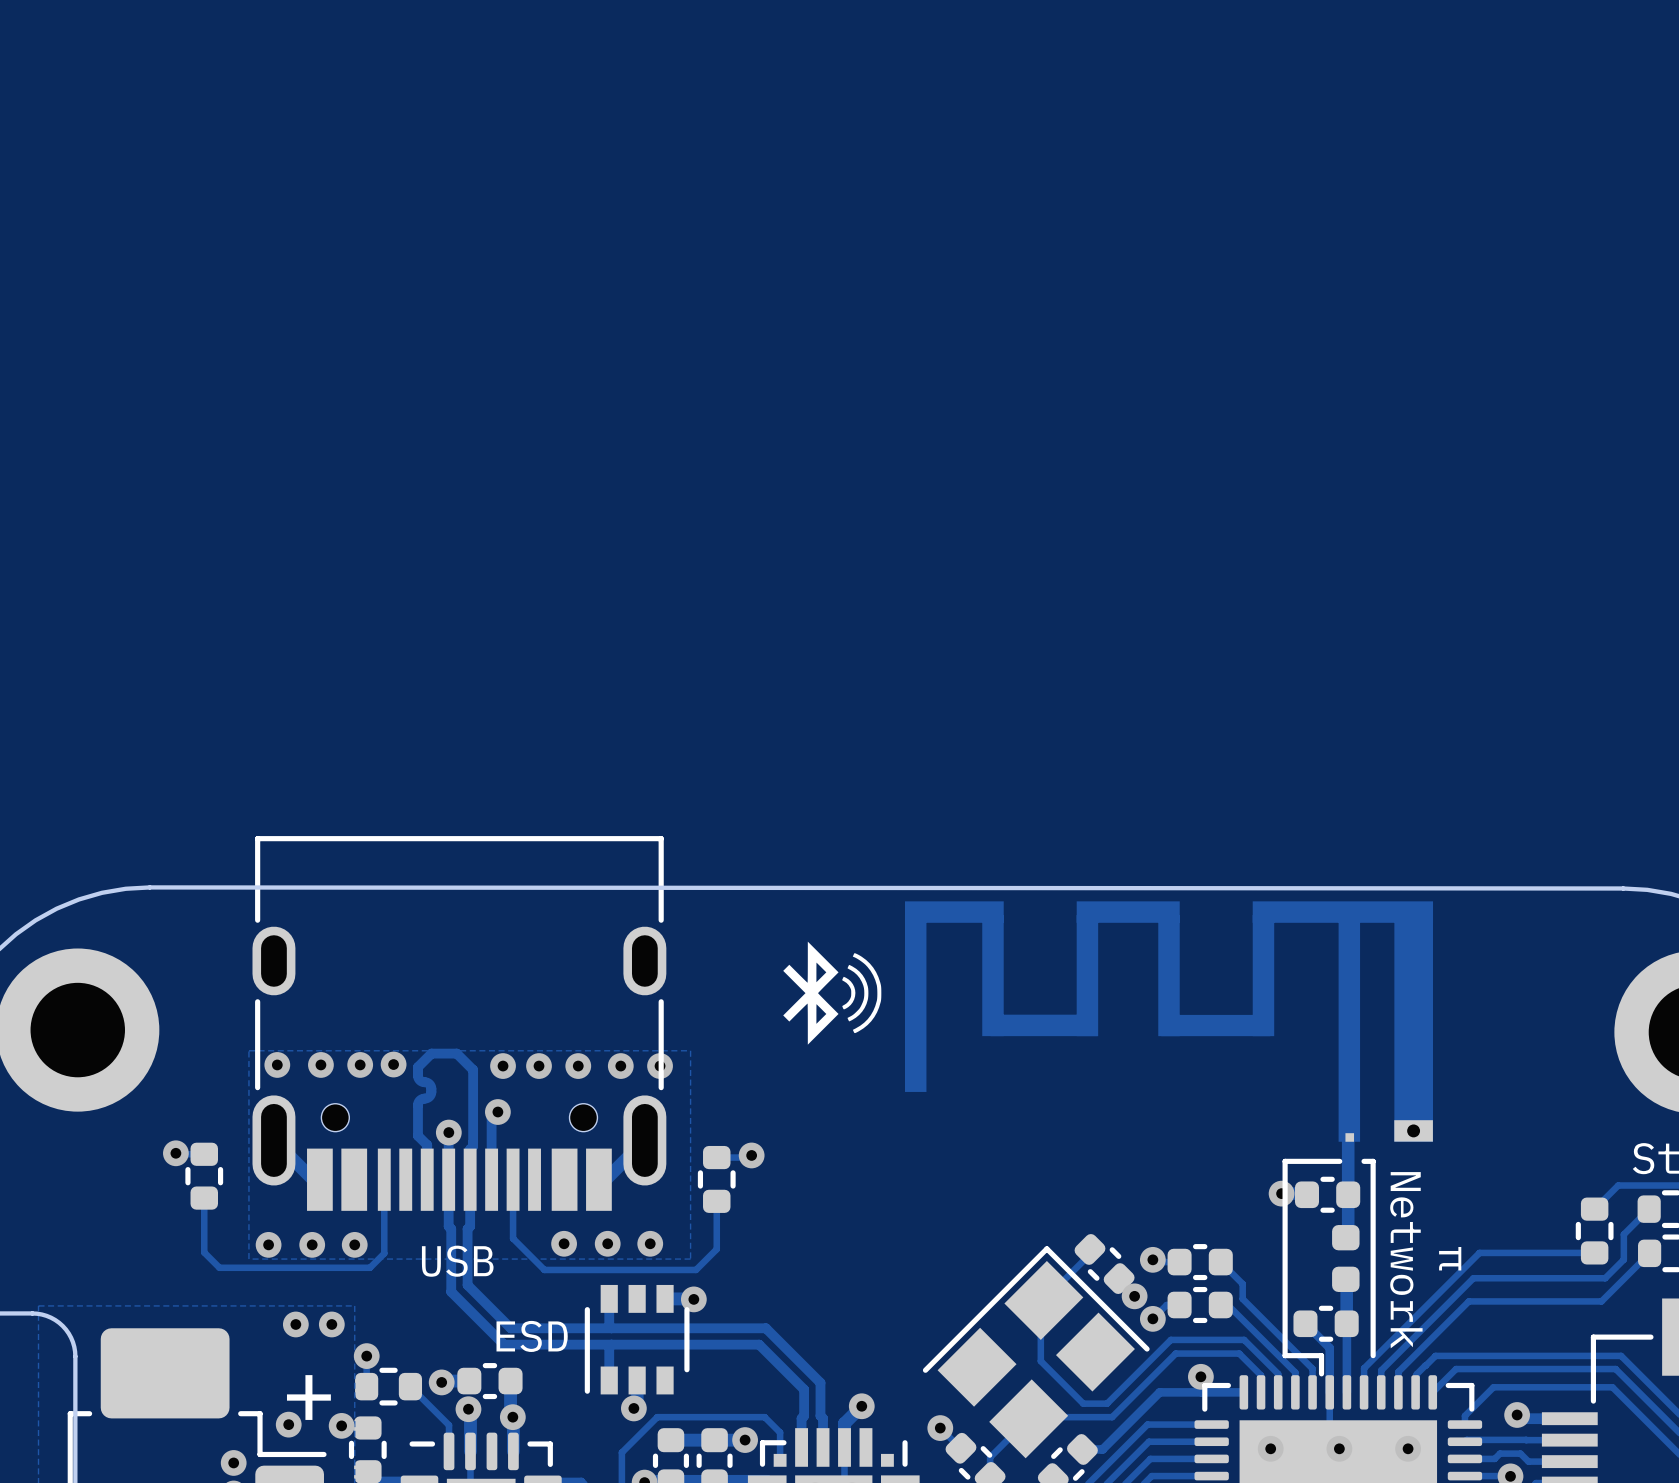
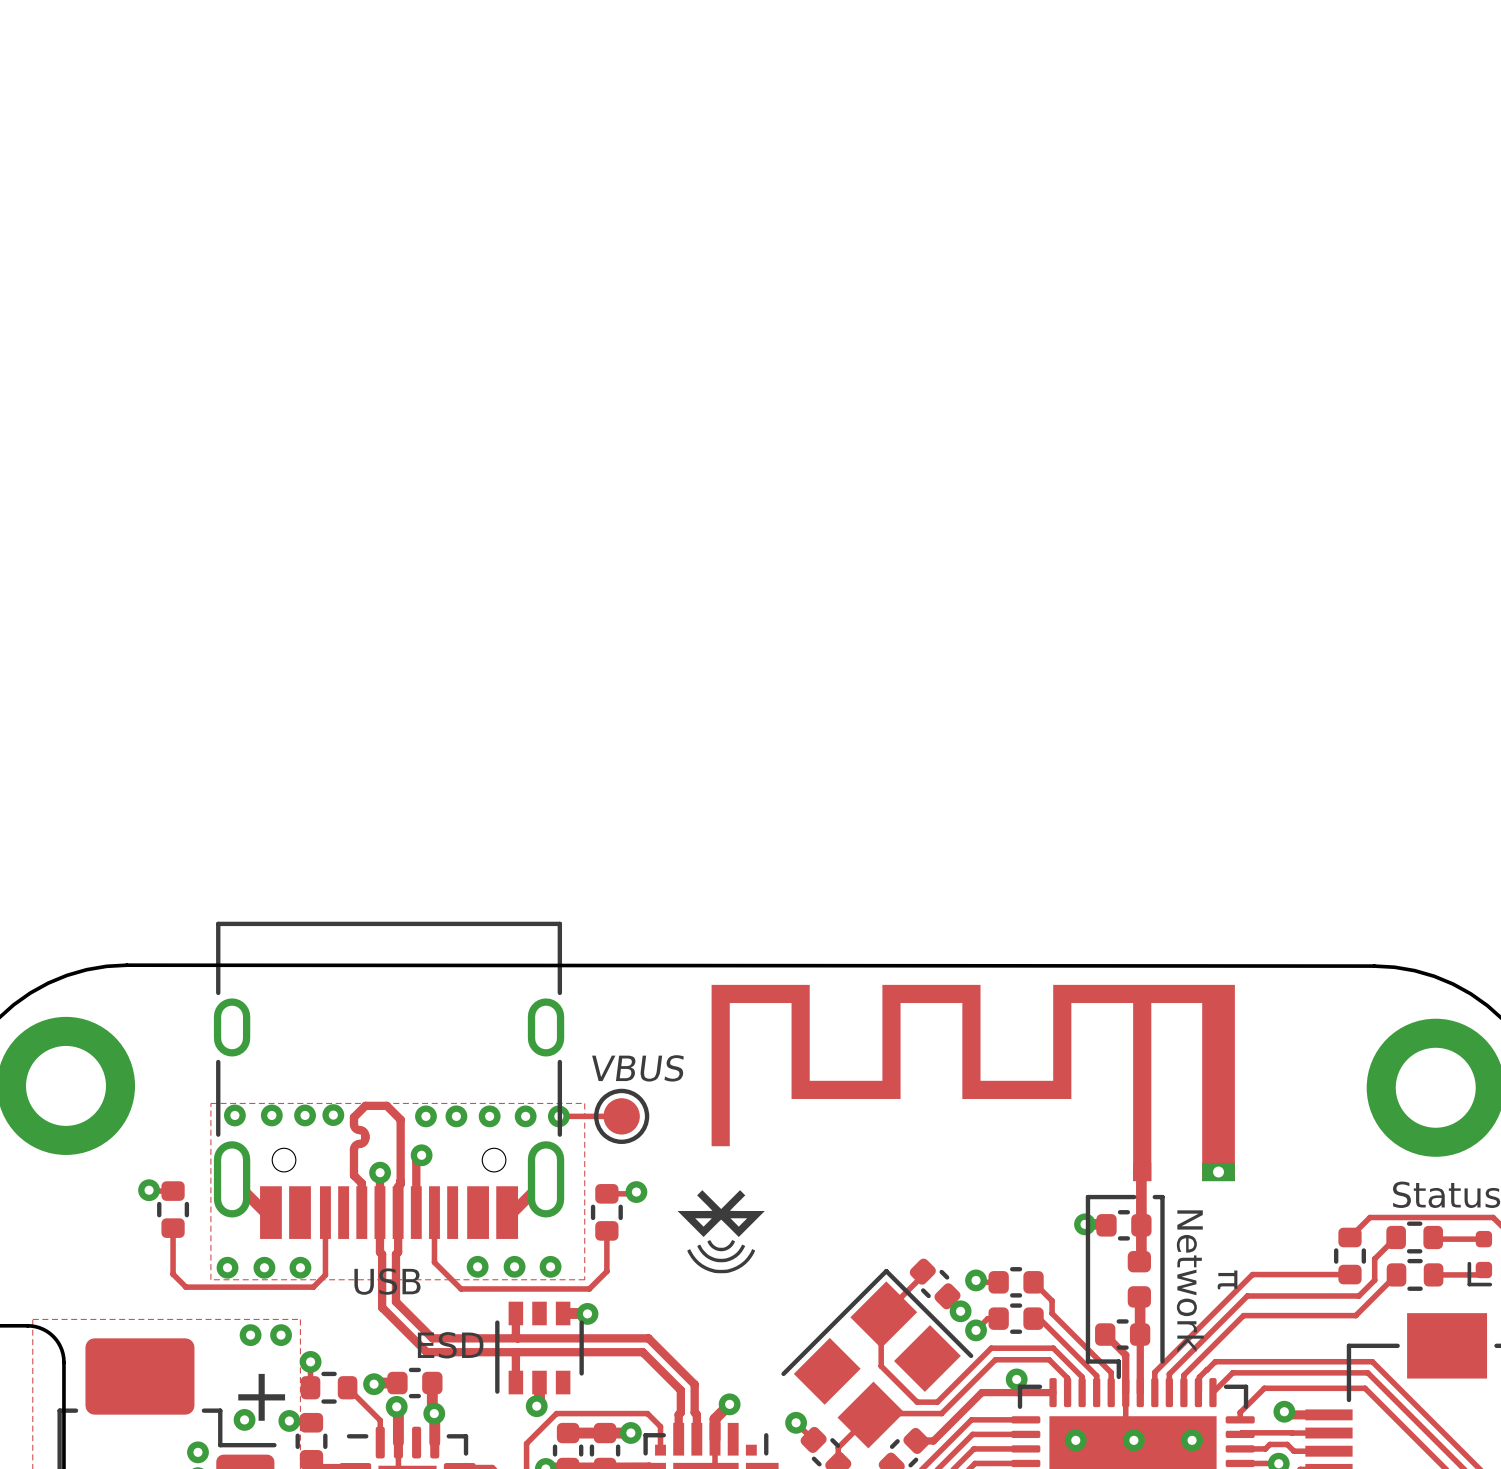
part footprint: [904, 901, 1434, 1142] -> [711, 984, 1235, 1182]
drawing: [783, 941, 882, 1045] -> none
text: none -> VBUS (637, 1068)
track: none -> (558, 1116) (621, 1116)
part: none -> (621, 1116)
drawing: none -> [677, 1190, 765, 1274]

